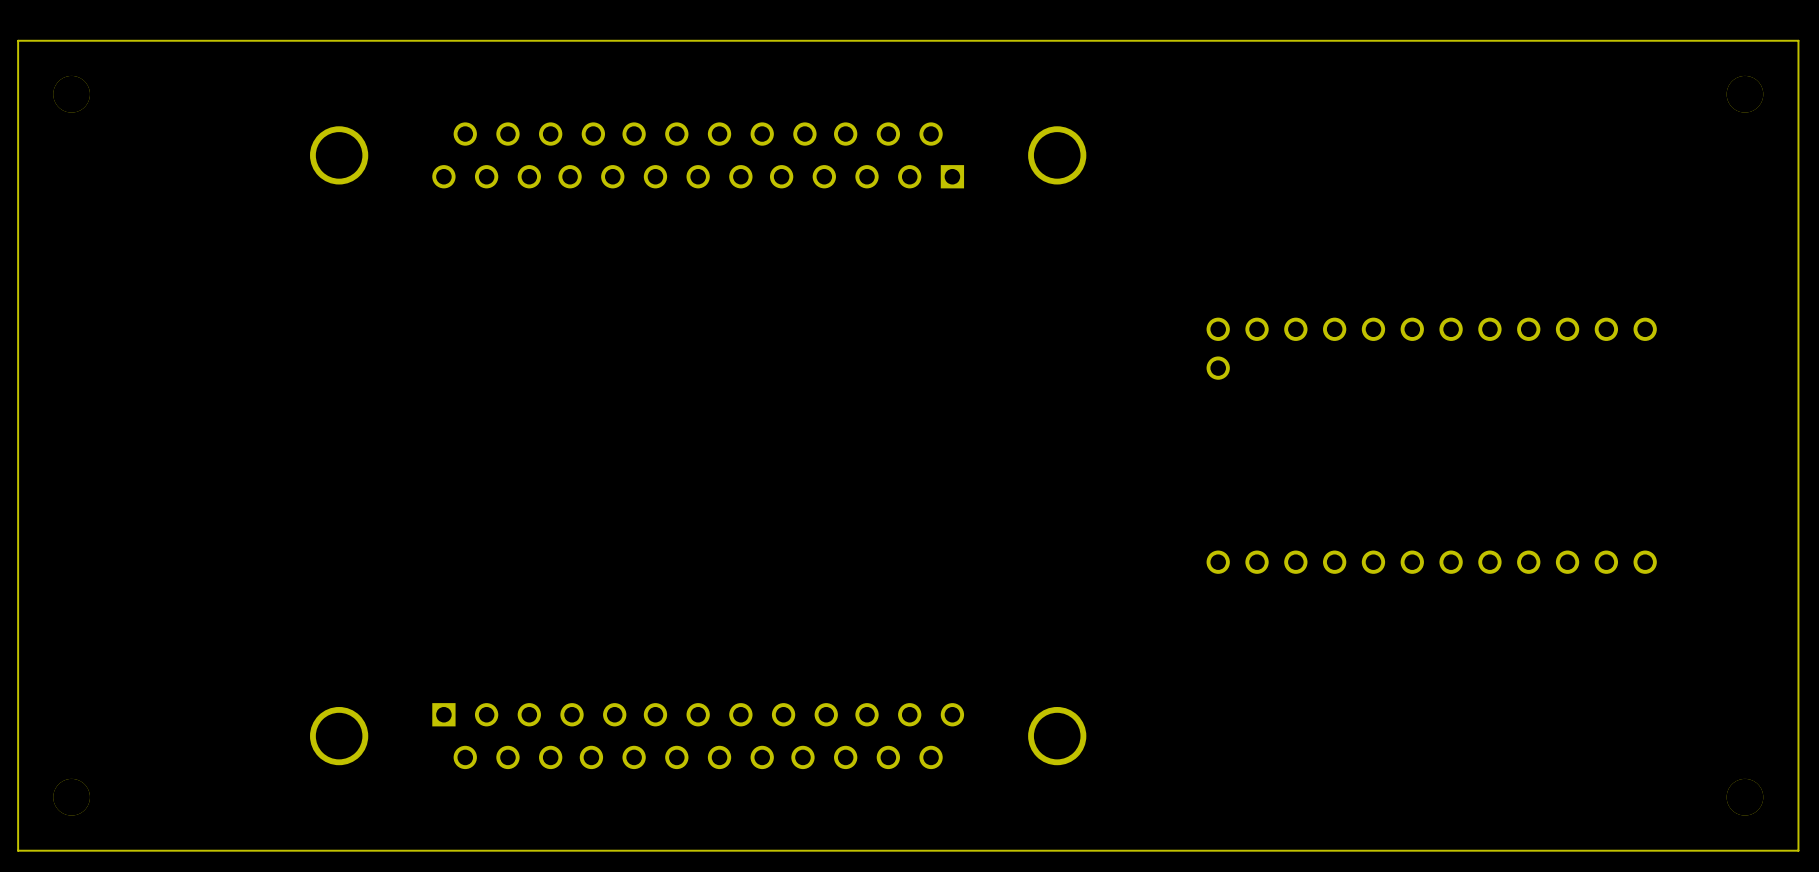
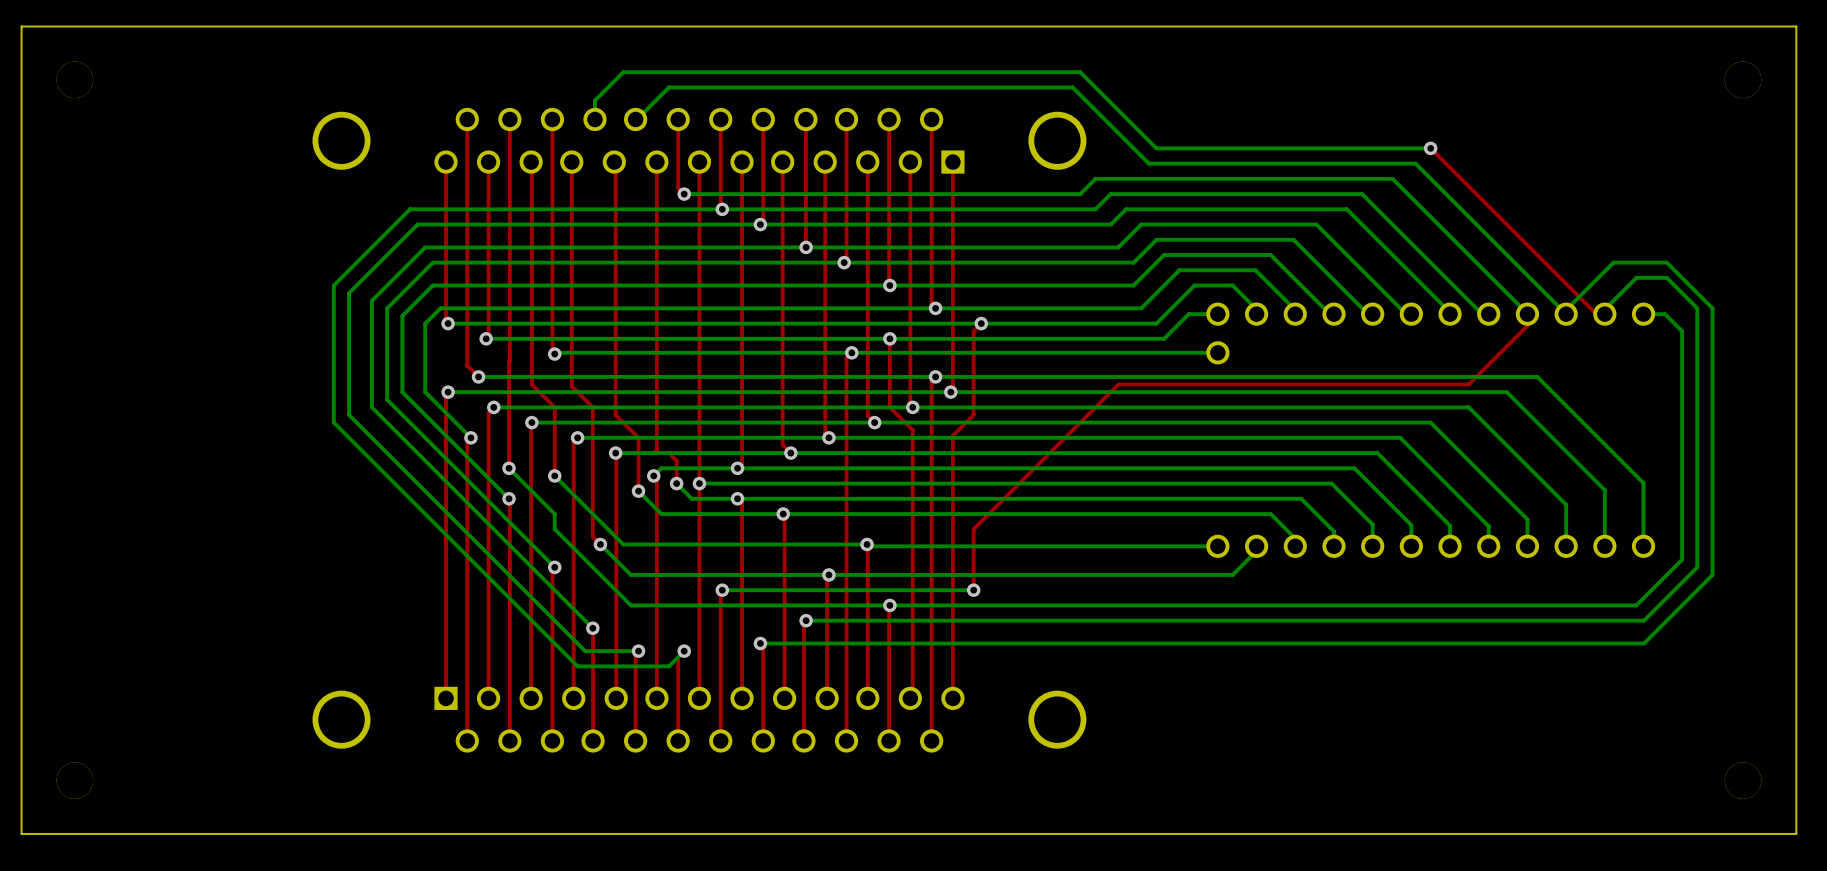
top track: none -> (467, 119) (467, 365) (478, 376)
top track: none -> (509, 119) (509, 468)
top track: none -> (552, 119) (552, 351) (554, 354)
bottom track: none -> (594, 119) (594, 100) (623, 72) (1080, 72) (1156, 148) (1430, 148)
bottom track: none -> (635, 119) (668, 87) (1072, 87) (1148, 163) (1415, 163) (1566, 314) (1566, 310) (1613, 262) (1666, 262) (1712, 308) (1712, 574) (1643, 643) (760, 643)
top track: none -> (678, 119) (678, 188) (684, 194)
top track: none -> (720, 119) (720, 207) (722, 209)
top track: none -> (763, 119) (763, 221) (760, 224)
top track: none -> (805, 119) (806, 247)
top track: none -> (846, 119) (846, 260) (844, 262)
top track: none -> (889, 119) (889, 285)
top track: none -> (931, 119) (931, 304) (935, 308)
top track: none -> (1430, 148) (1596, 314) (1604, 314)
via: none -> (1430, 148)
top track: none -> (446, 162) (446, 321) (448, 323)
top track: none -> (488, 162) (488, 336) (486, 338)
top track: none -> (531, 162) (531, 384) (554, 407) (554, 475)
top track: none -> (571, 162) (571, 386) (592, 407) (592, 536) (600, 544)
top track: none -> (614, 162) (615, 414) (638, 437) (638, 491)
top track: none -> (656, 162) (656, 449) (653, 453) (668, 453) (676, 460) (676, 483)
top track: none -> (699, 162) (699, 698)
top track: none -> (742, 162) (742, 463) (737, 468)
top track: none -> (782, 162) (782, 444) (790, 453)
top track: none -> (825, 162) (825, 434) (828, 437)
top track: none -> (867, 162) (867, 415) (874, 422)
top track: none -> (910, 162) (910, 404) (912, 407)
top track: none -> (952, 162) (952, 390) (950, 392)
bottom track: none -> (684, 194) (1080, 194) (1095, 178) (1392, 178) (1527, 314)
via: none -> (684, 194)
via: none -> (722, 209)
via: none -> (760, 224)
via: none -> (806, 247)
via: none -> (844, 262)
via: none -> (889, 285)
via: none -> (935, 308)
bottom track: none -> (1217, 314) (1188, 314) (1164, 338) (486, 338)
bottom track: none -> (1256, 314) (1256, 309) (1232, 285) (1194, 285) (1156, 323) (448, 323)
bottom track: none -> (1295, 314) (1295, 310) (1255, 270) (1179, 270) (1141, 308) (440, 308) (425, 323) (425, 392) (470, 437)
bottom track: none -> (1333, 314) (1329, 314) (1270, 255) (1164, 255) (1133, 285) (432, 285) (402, 315) (402, 392) (509, 498)
bottom track: none -> (1372, 314) (1367, 314) (1293, 239) (1156, 239) (1133, 262) (432, 262) (387, 308) (387, 399) (554, 567)
bottom track: none -> (1411, 314) (1406, 314) (1316, 224) (1141, 224) (1118, 247) (425, 247) (371, 300) (371, 407) (592, 628)
bottom track: none -> (1450, 314) (1346, 209) (1126, 209) (1110, 224) (417, 224) (349, 293) (349, 414) (585, 651) (638, 651)
bottom track: none -> (1488, 314) (1482, 314) (1362, 194) (1110, 194) (1095, 209) (410, 209) (333, 285) (333, 422) (577, 666) (668, 666) (684, 651)
top track: none -> (1527, 314) (1527, 325) (1468, 384) (1118, 384) (973, 529) (973, 590)
bottom track: none -> (1604, 314) (1604, 309) (1636, 277) (1666, 277) (1697, 308) (1697, 567) (1643, 620) (806, 620)
bottom track: none -> (1643, 314) (1665, 314) (1682, 331) (1682, 559) (1636, 605) (630, 605) (554, 529) (554, 514) (509, 468)
via: none -> (448, 323)
top track: none -> (981, 323) (973, 331) (973, 414) (952, 435) (952, 698)
via: none -> (981, 323)
via: none -> (486, 338)
top track: none -> (889, 338) (889, 407) (912, 430) (912, 696) (910, 698)
via: none -> (889, 338)
top track: none -> (851, 352) (846, 358) (846, 740)
via: none -> (851, 352)
bottom track: none -> (1217, 352) (554, 354)
via: none -> (554, 354)
bottom track: none -> (478, 376) (1537, 376) (1643, 483) (1643, 546)
via: none -> (478, 376)
top track: none -> (935, 376) (931, 380) (931, 740)
via: none -> (935, 376)
top track: none -> (448, 392) (446, 394) (446, 698)
bottom track: none -> (448, 392) (1506, 392) (1604, 490) (1604, 546)
via: none -> (448, 392)
via: none -> (950, 392)
top track: none -> (493, 407) (488, 412) (488, 698)
bottom track: none -> (493, 407) (1468, 407) (1566, 504) (1566, 546)
via: none -> (493, 407)
via: none -> (912, 407)
top track: none -> (531, 422) (531, 698)
bottom track: none -> (531, 422) (1430, 422) (1527, 519) (1527, 546)
via: none -> (531, 422)
via: none -> (874, 422)
top track: none -> (470, 437) (467, 441) (467, 740)
via: none -> (470, 437)
top track: none -> (577, 437) (573, 441) (573, 698)
bottom track: none -> (577, 437) (1400, 437) (1488, 526) (1488, 546)
via: none -> (577, 437)
via: none -> (828, 437)
top track: none -> (615, 453) (616, 698)
bottom track: none -> (615, 453) (1377, 453) (1450, 525) (1450, 546)
via: none -> (615, 453)
via: none -> (790, 453)
via: none -> (509, 468)
via: none -> (737, 468)
bottom track: none -> (554, 475) (623, 544) (1217, 546)
via: none -> (554, 475)
top track: none -> (653, 475) (656, 479) (656, 698)
bottom track: none -> (653, 475) (661, 468) (1354, 468) (1411, 525) (1411, 546)
via: none -> (653, 475)
bottom track: none -> (676, 483) (691, 498) (1301, 498) (1333, 531) (1333, 546)
via: none -> (676, 483)
bottom track: none -> (699, 483) (1331, 483) (1372, 524) (1372, 546)
via: none -> (699, 483)
bottom track: none -> (638, 491) (661, 514) (1270, 514) (1295, 538) (1295, 546)
via: none -> (638, 491)
top track: none -> (509, 498) (509, 740)
via: none -> (509, 498)
top track: none -> (737, 498) (742, 503) (742, 698)
via: none -> (737, 498)
top track: none -> (783, 514) (784, 698)
via: none -> (783, 514)
bottom track: none -> (600, 544) (630, 574) (1232, 574) (1256, 551) (1256, 546)
via: none -> (600, 544)
top track: none -> (867, 544) (867, 698)
via: none -> (867, 544)
top track: none -> (554, 567) (552, 569) (552, 740)
via: none -> (554, 567)
top track: none -> (828, 574) (827, 576) (827, 698)
via: none -> (828, 574)
top track: none -> (722, 590) (720, 591) (720, 740)
via: none -> (722, 590)
bottom track: none -> (973, 590) (722, 590)
via: none -> (973, 590)
top track: none -> (889, 605) (889, 740)
via: none -> (889, 605)
top track: none -> (806, 620) (803, 622) (803, 740)
via: none -> (806, 620)
top track: none -> (592, 628) (593, 740)
via: none -> (592, 628)
top track: none -> (760, 643) (763, 646) (763, 740)
via: none -> (760, 643)
top track: none -> (638, 651) (635, 654) (635, 740)
via: none -> (638, 651)
top track: none -> (684, 651) (678, 657) (678, 740)
via: none -> (684, 651)

